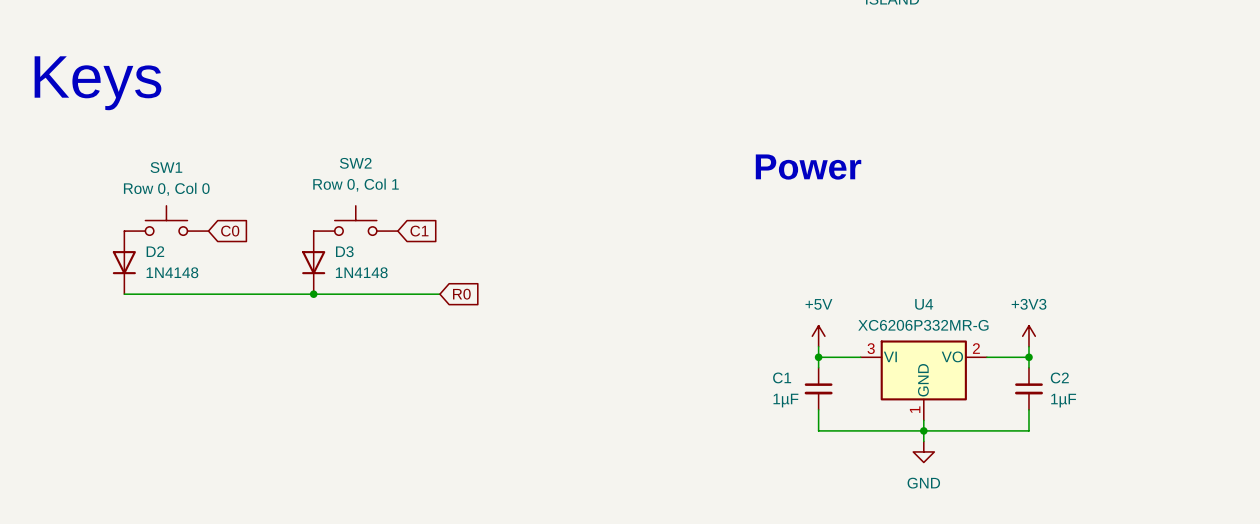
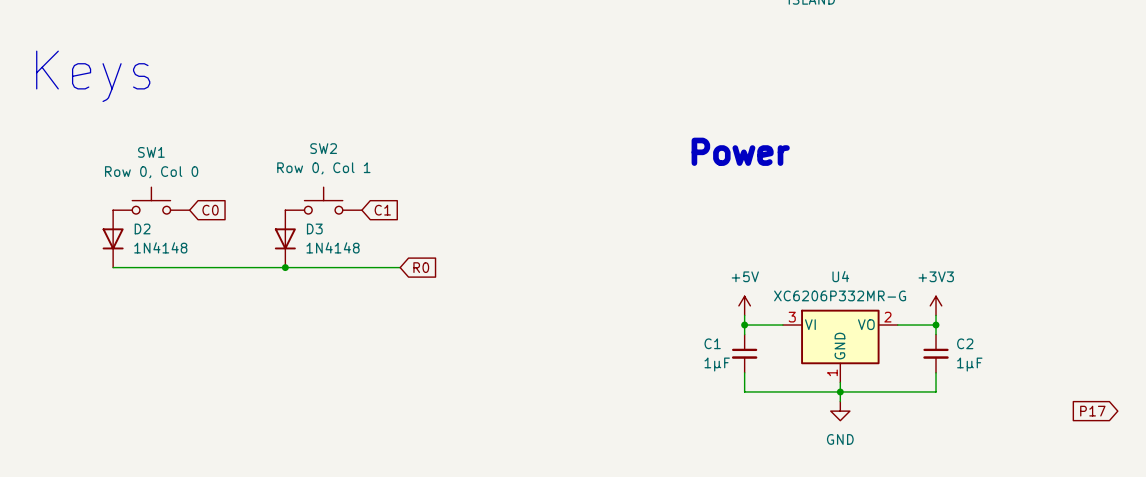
global label: none -> P17 (1092, 411)

